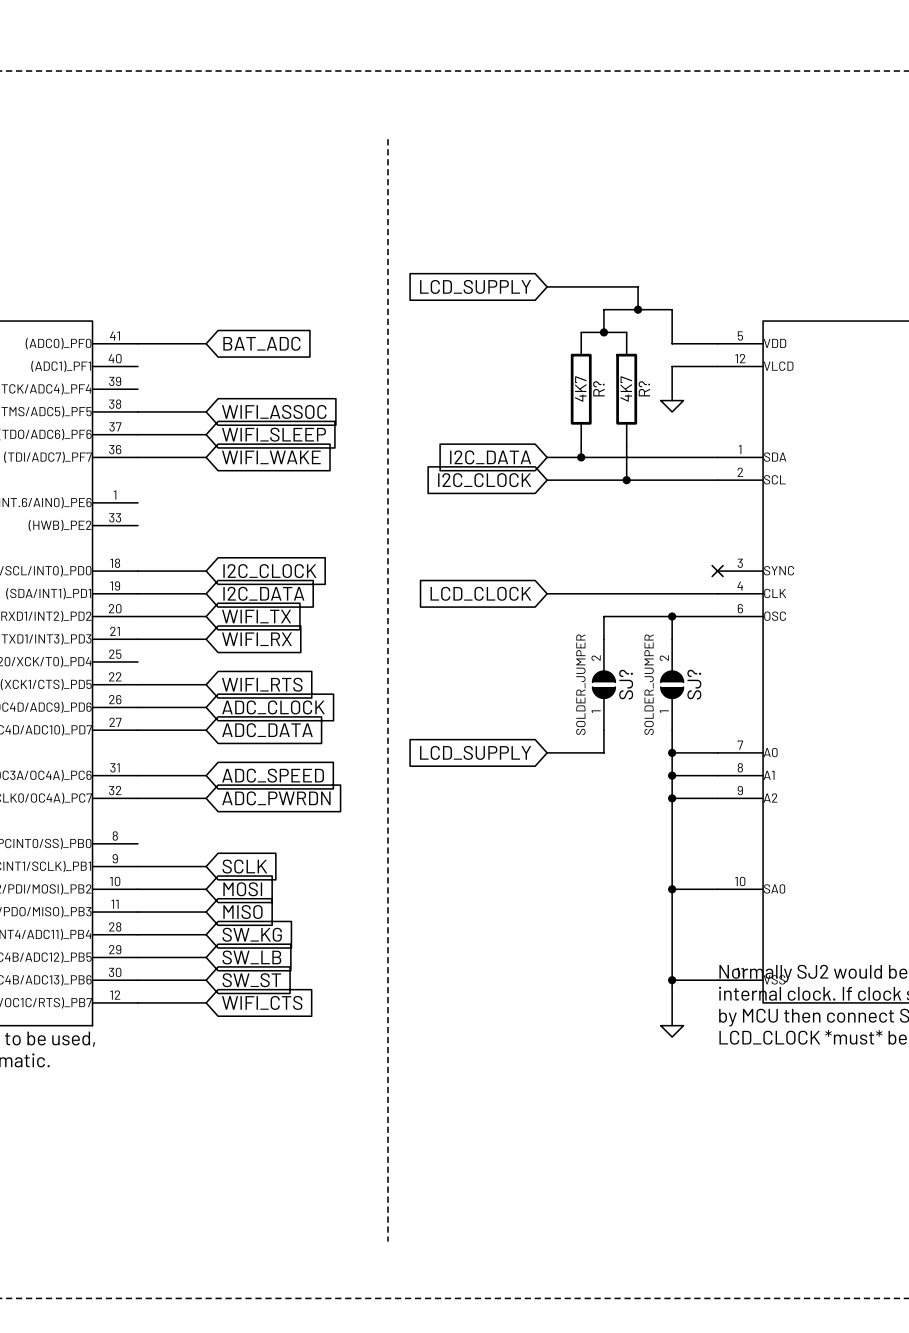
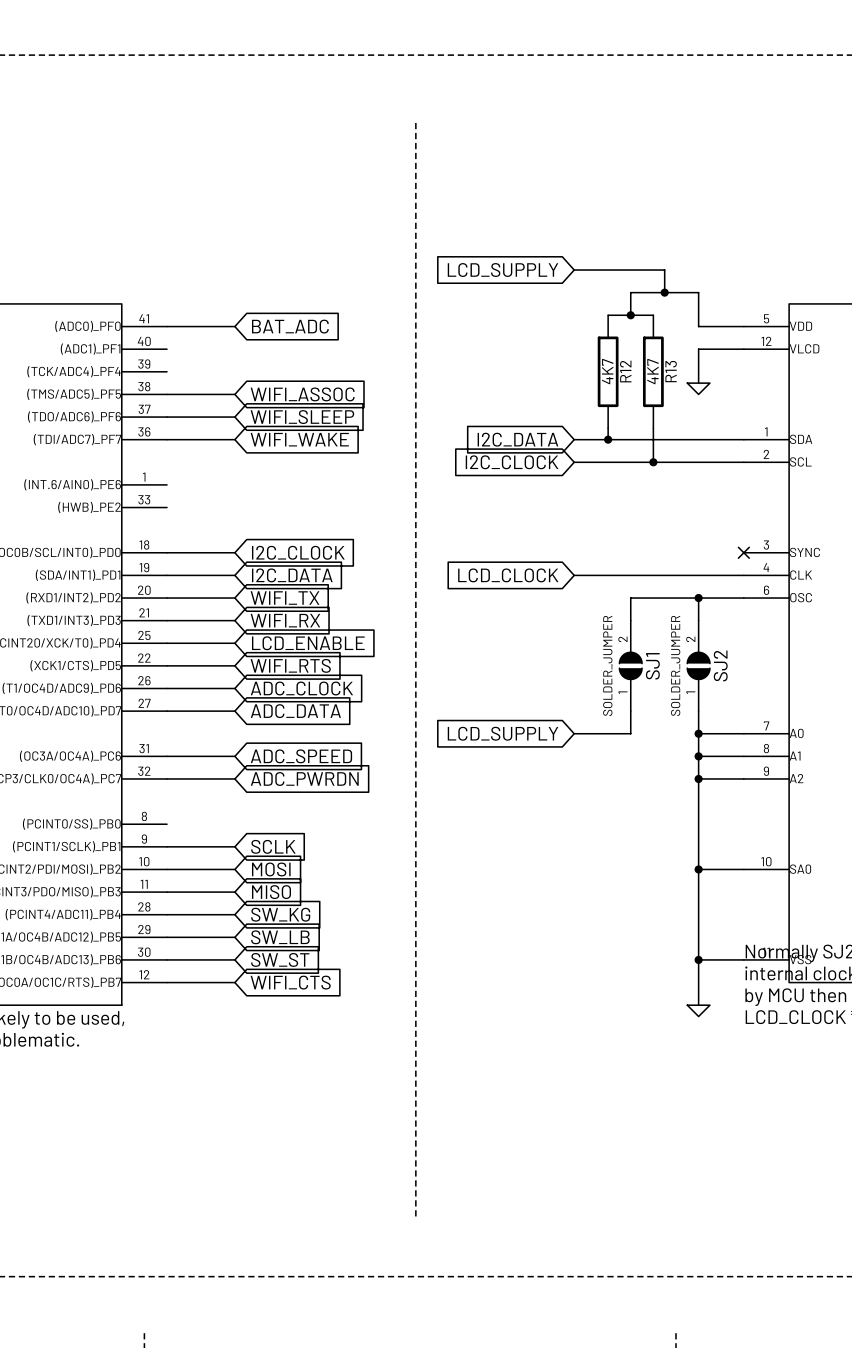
R? name: R? (598, 388) -> R12 (625, 371)
R? name: R? (644, 388) -> R13 (671, 371)
wire: none -> (167, 643) (234, 643)
global label: none -> LCD_ENABLE (308, 643)
SJ? name: SJ? (626, 684) -> SJ1 (652, 666)
SJ? name: SJ? (694, 684) -> SJ2 (720, 665)

